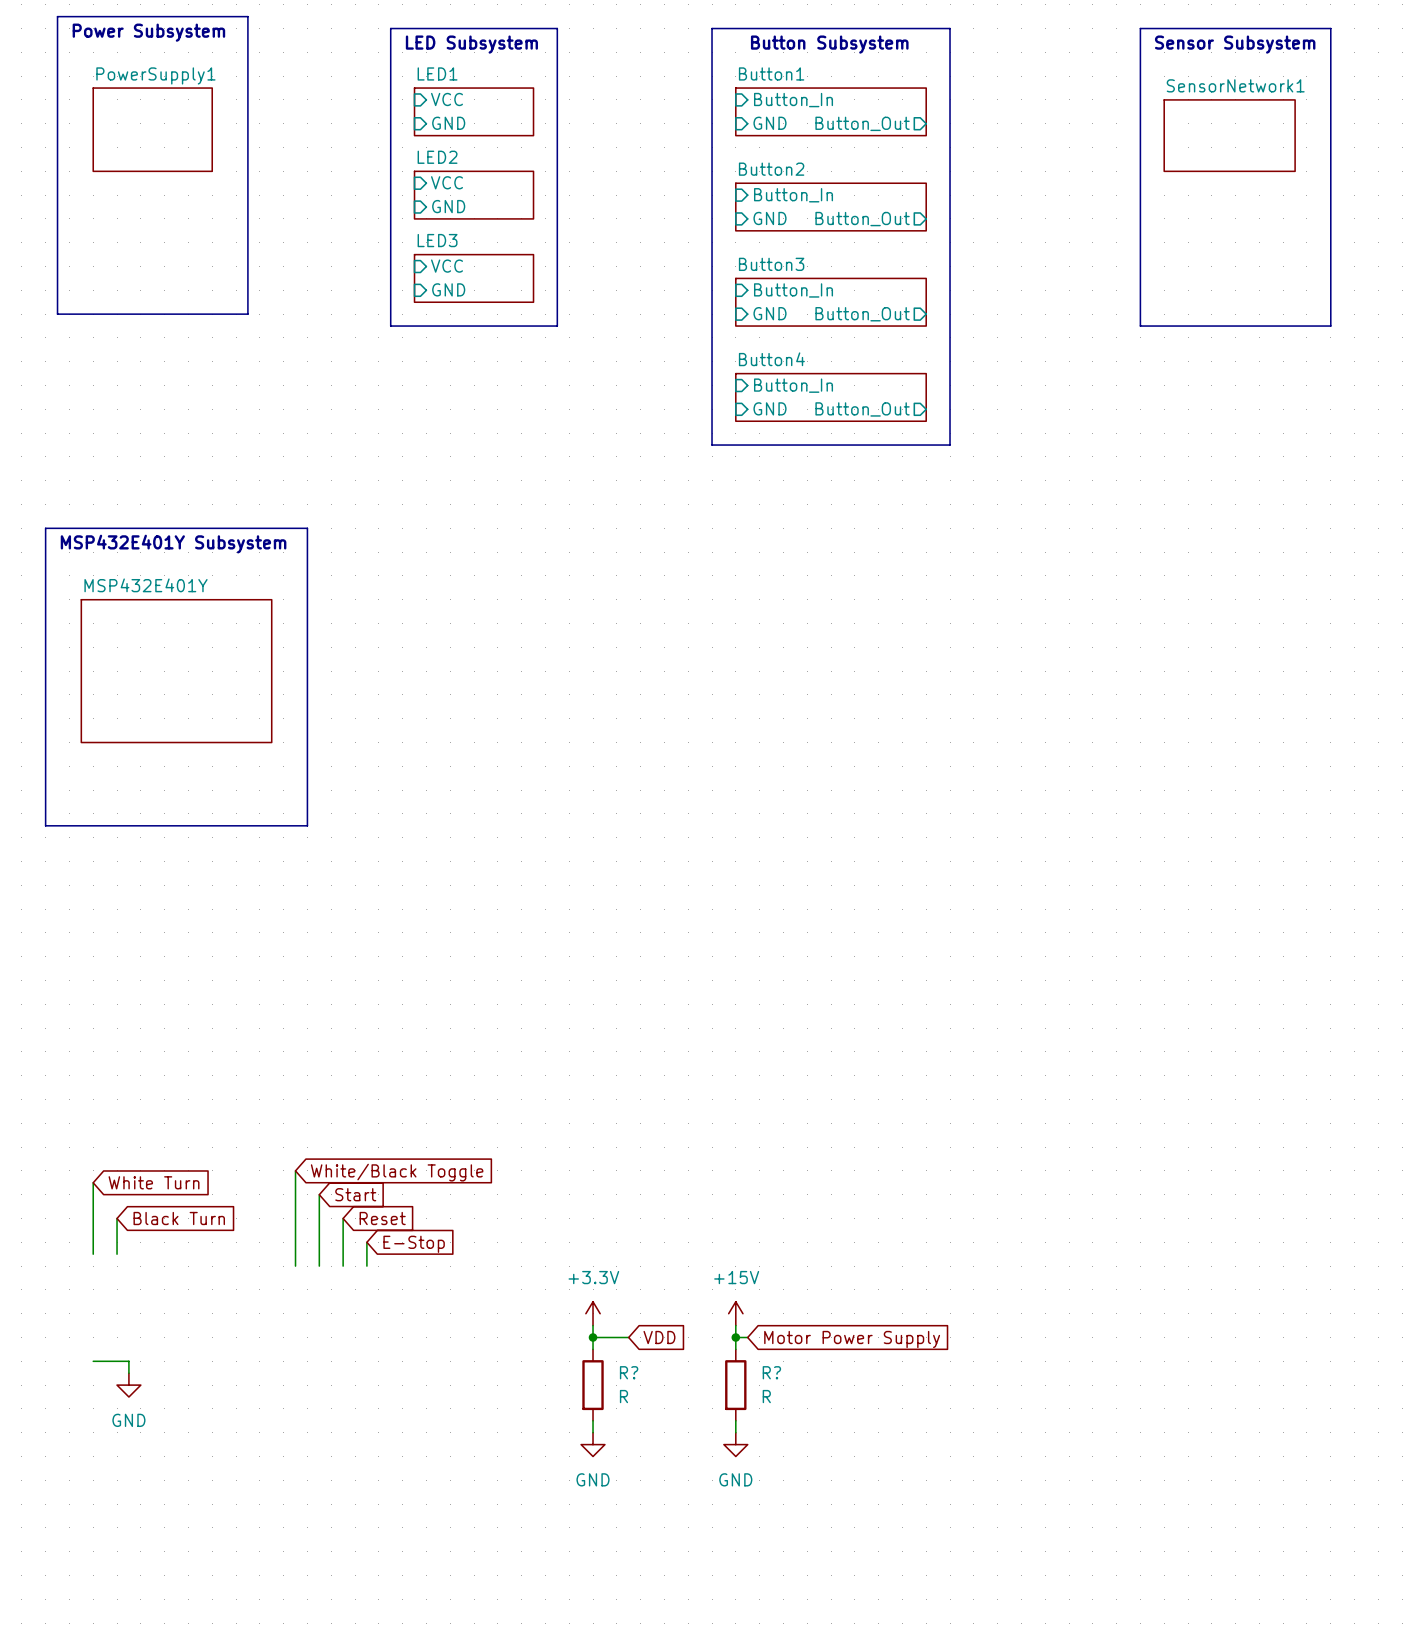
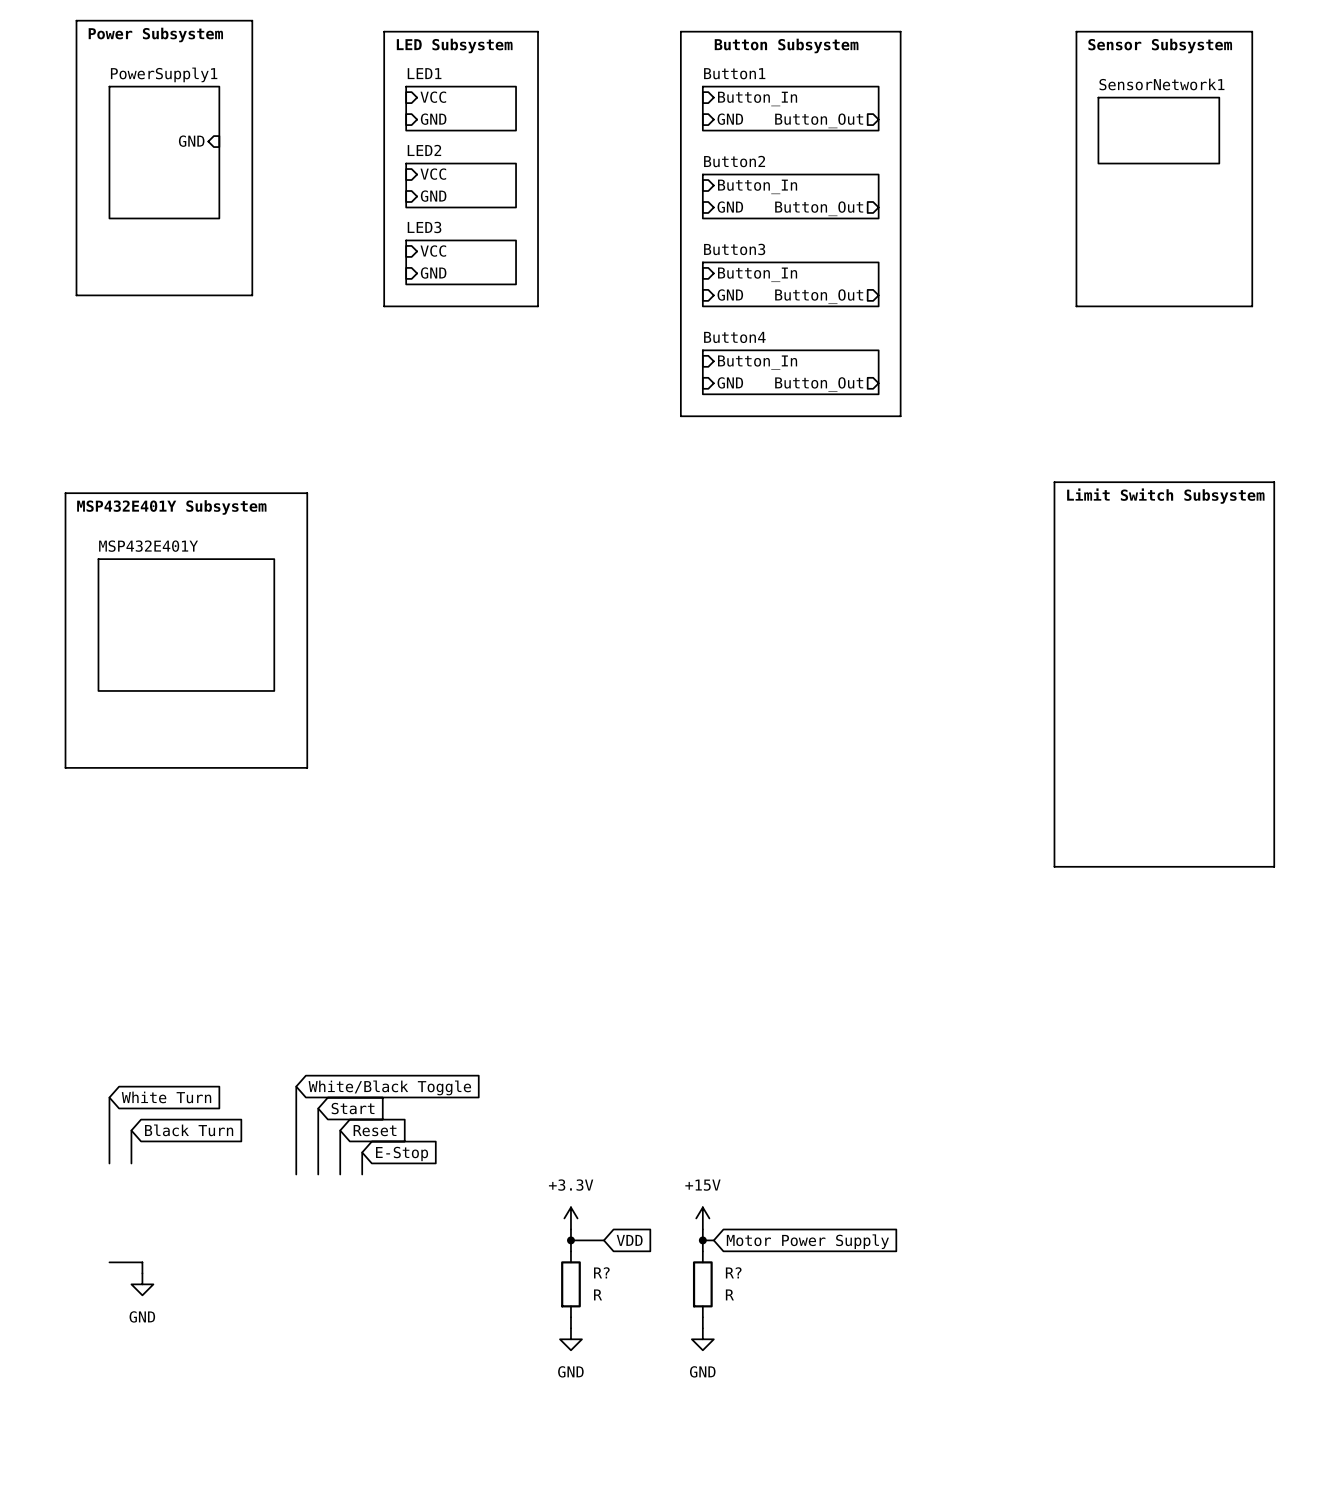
sheet PowerSupply1 shape: [92, 87, 213, 173] -> [108, 85, 221, 220]
sheet pin: none -> GND (191, 141)
line: none -> (1054, 482) (1054, 866) (1274, 866) (1274, 482) (1054, 482)
text: none -> Limit Switch Subsystem (1165, 496)

